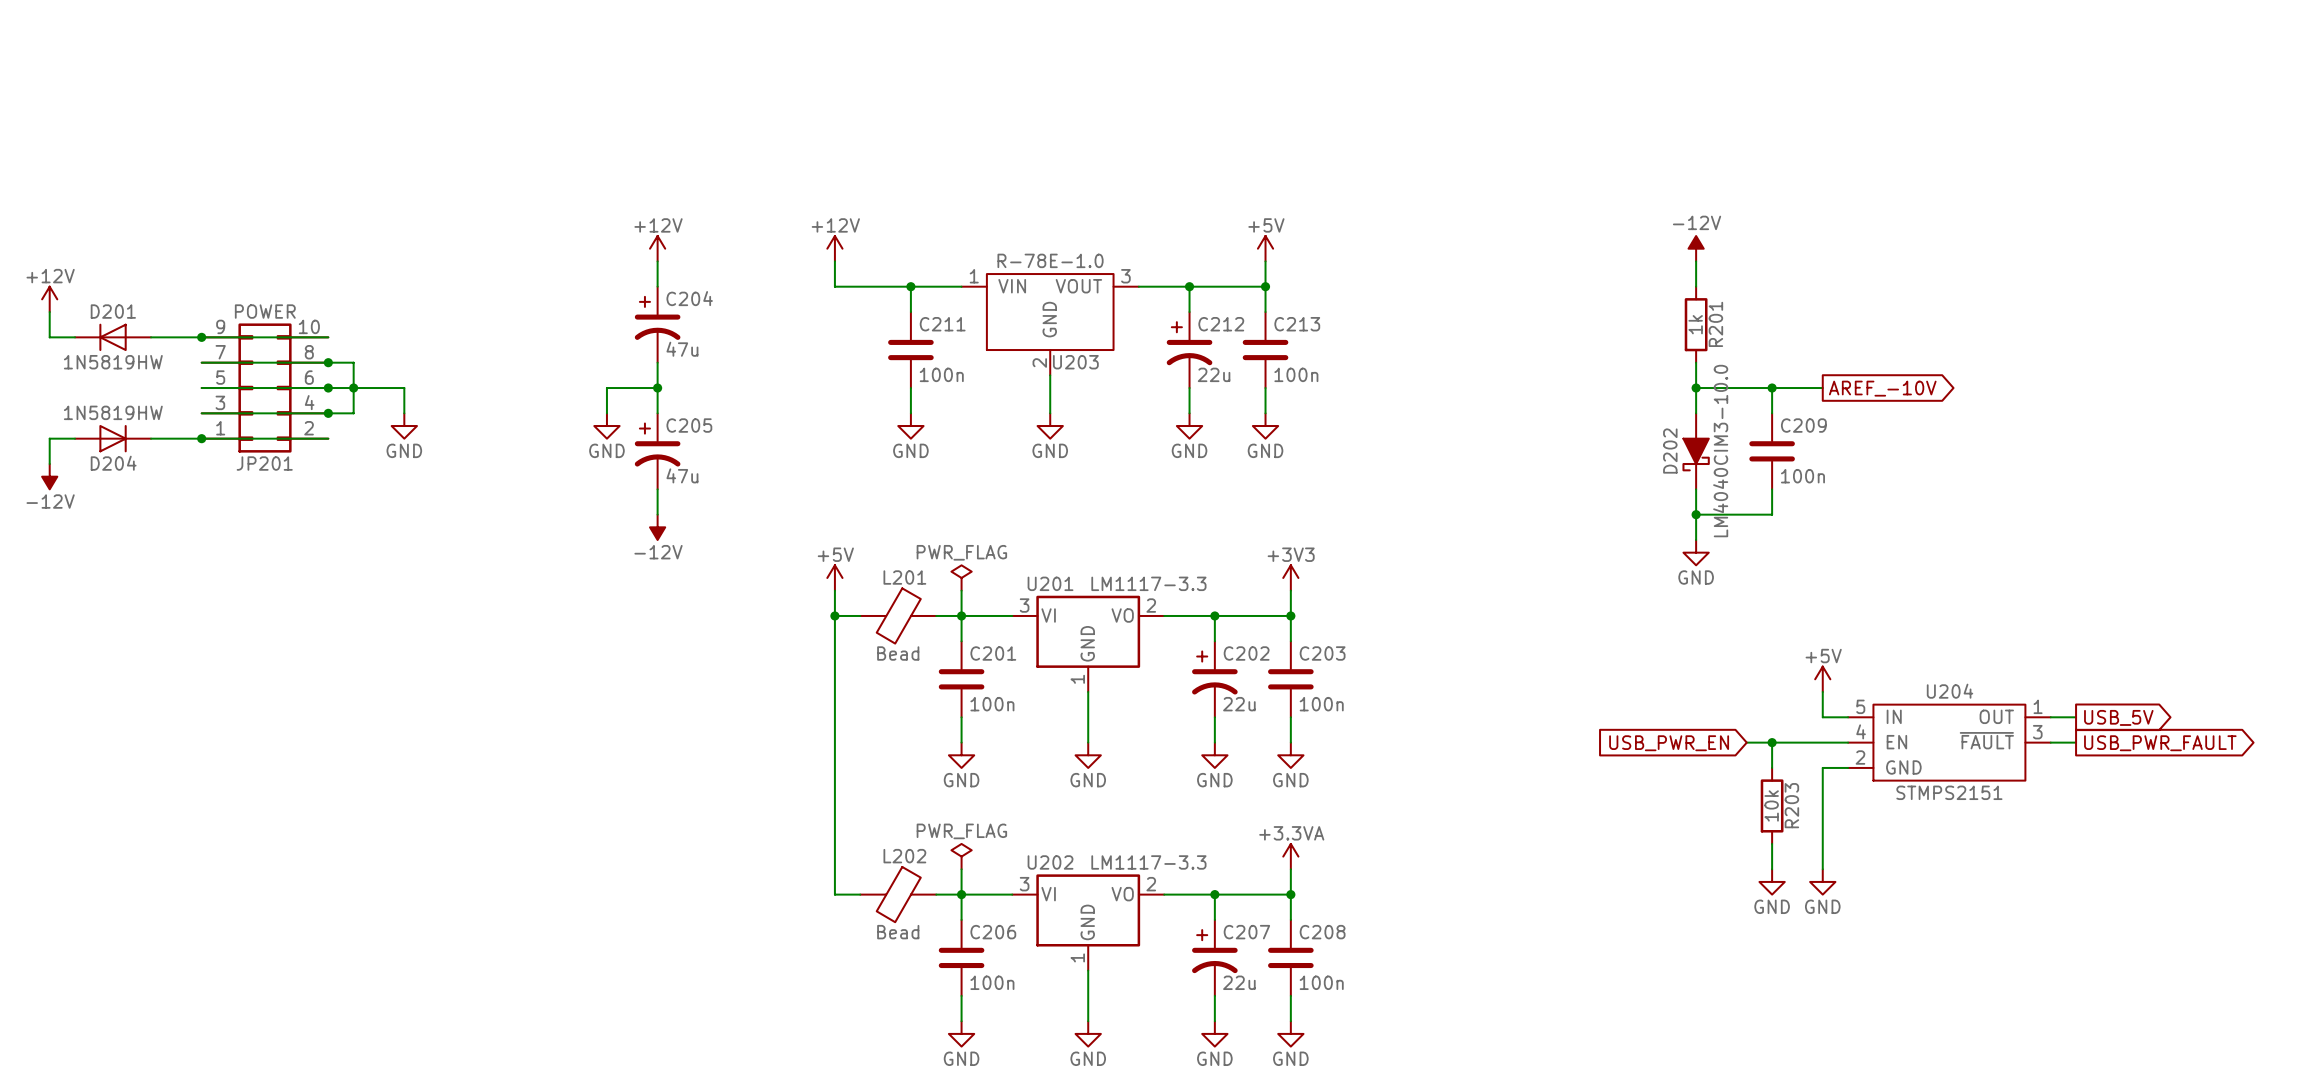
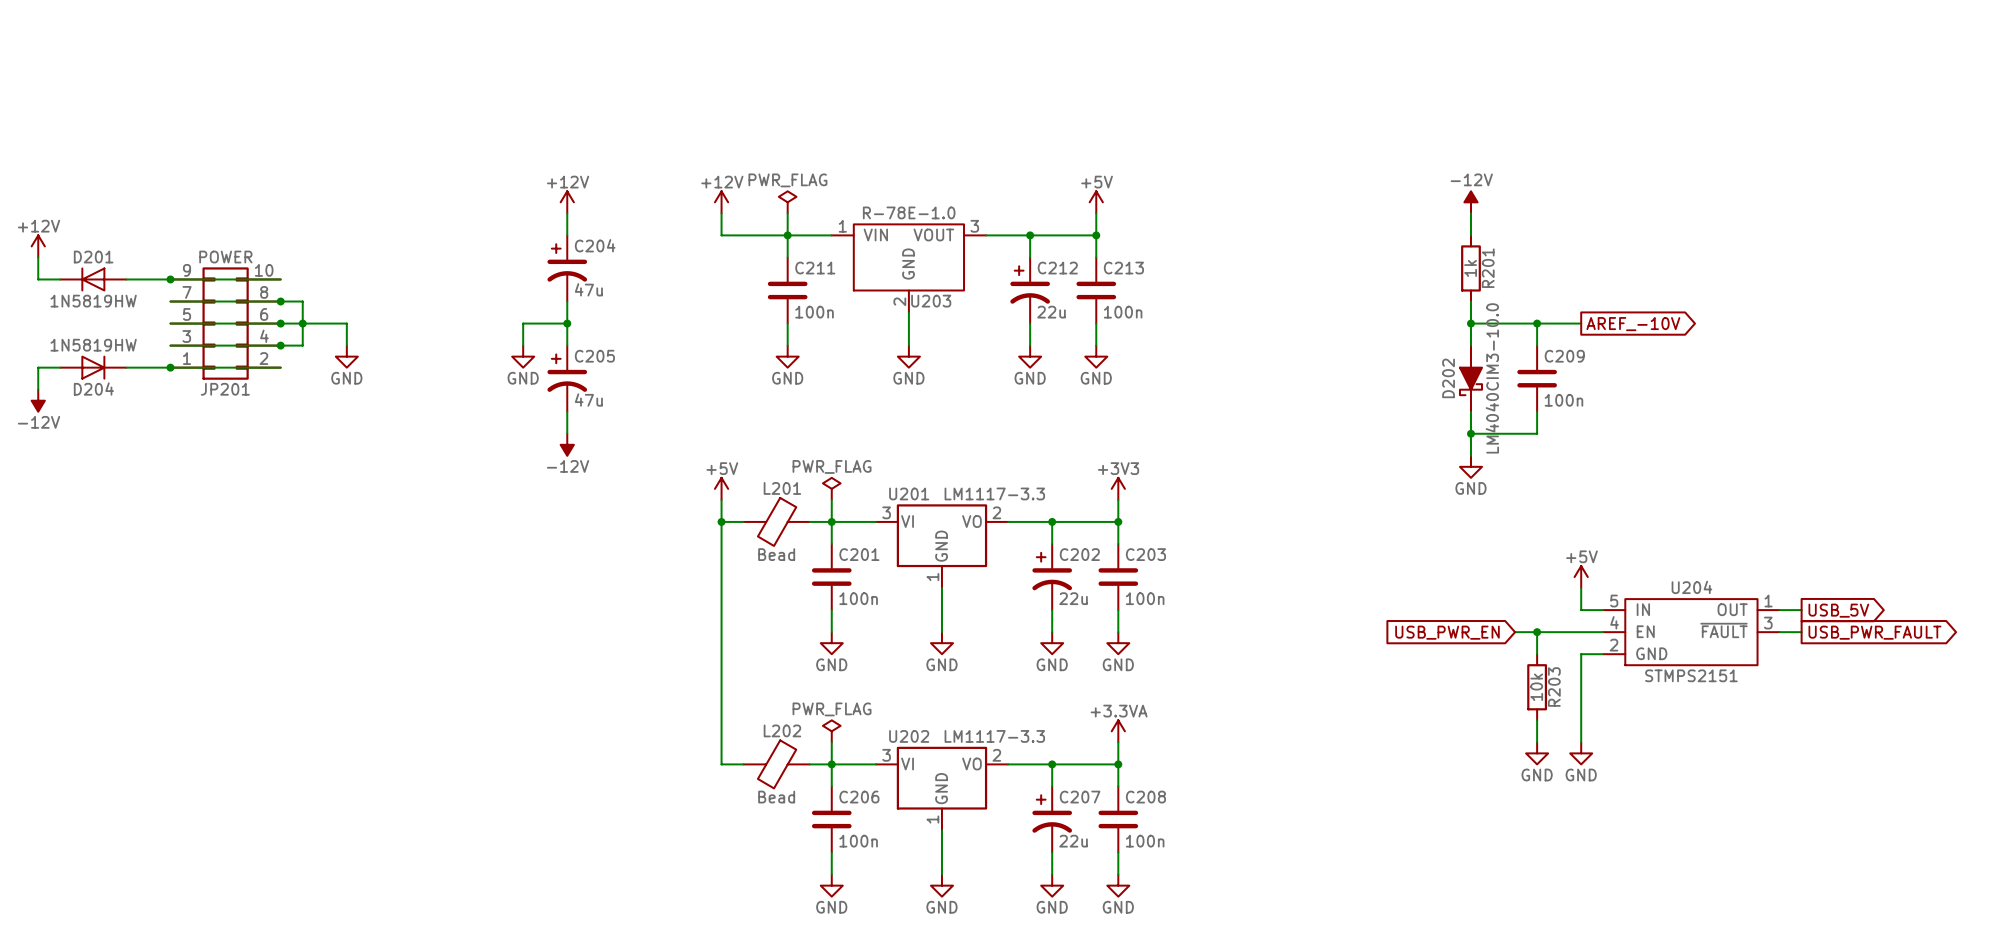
power symbol: none -> PWR_FLAG (787, 202)
wire: none -> (787, 213) (787, 235)

